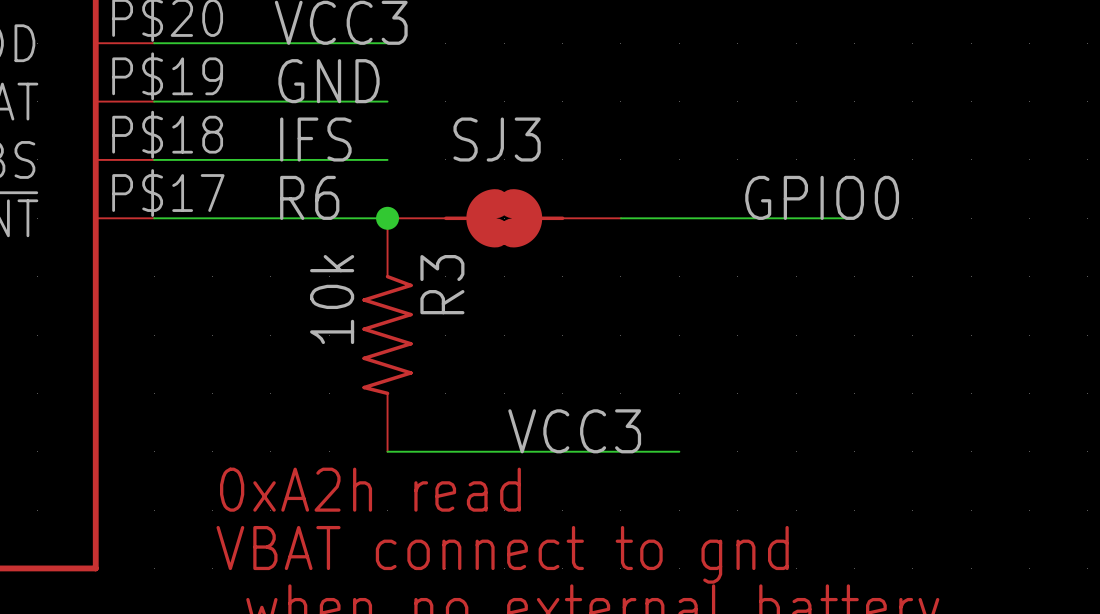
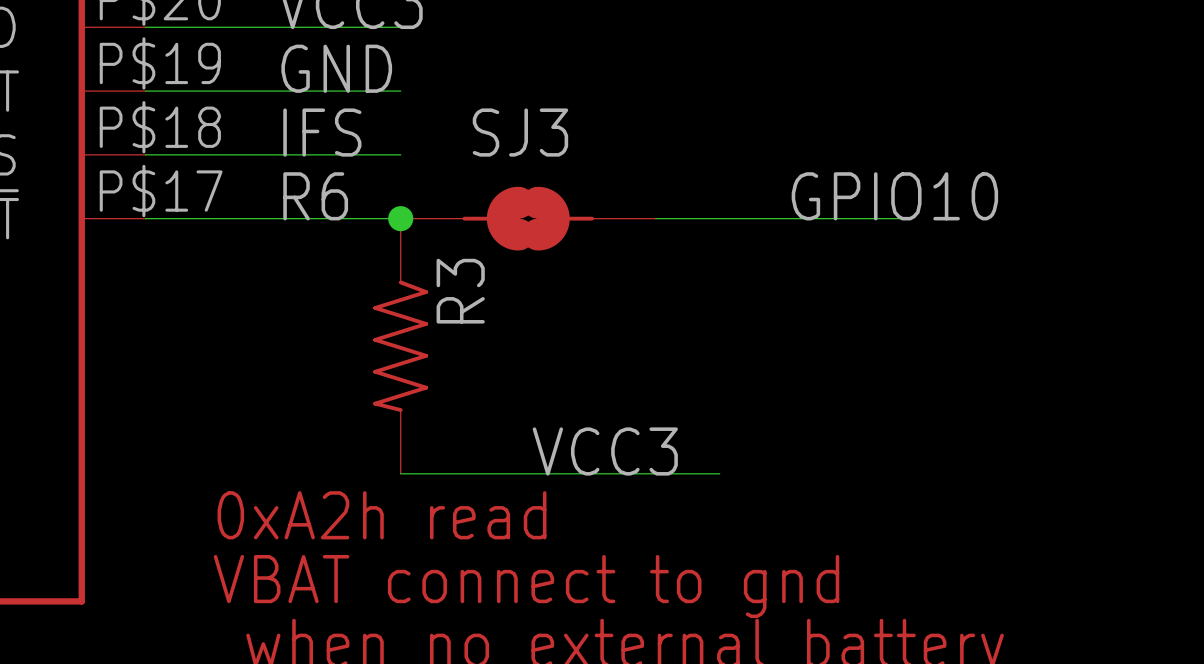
label: GPIO0 (822, 197) -> GPIO10 (894, 196)
R3 value: 10k (332, 299) -> none

